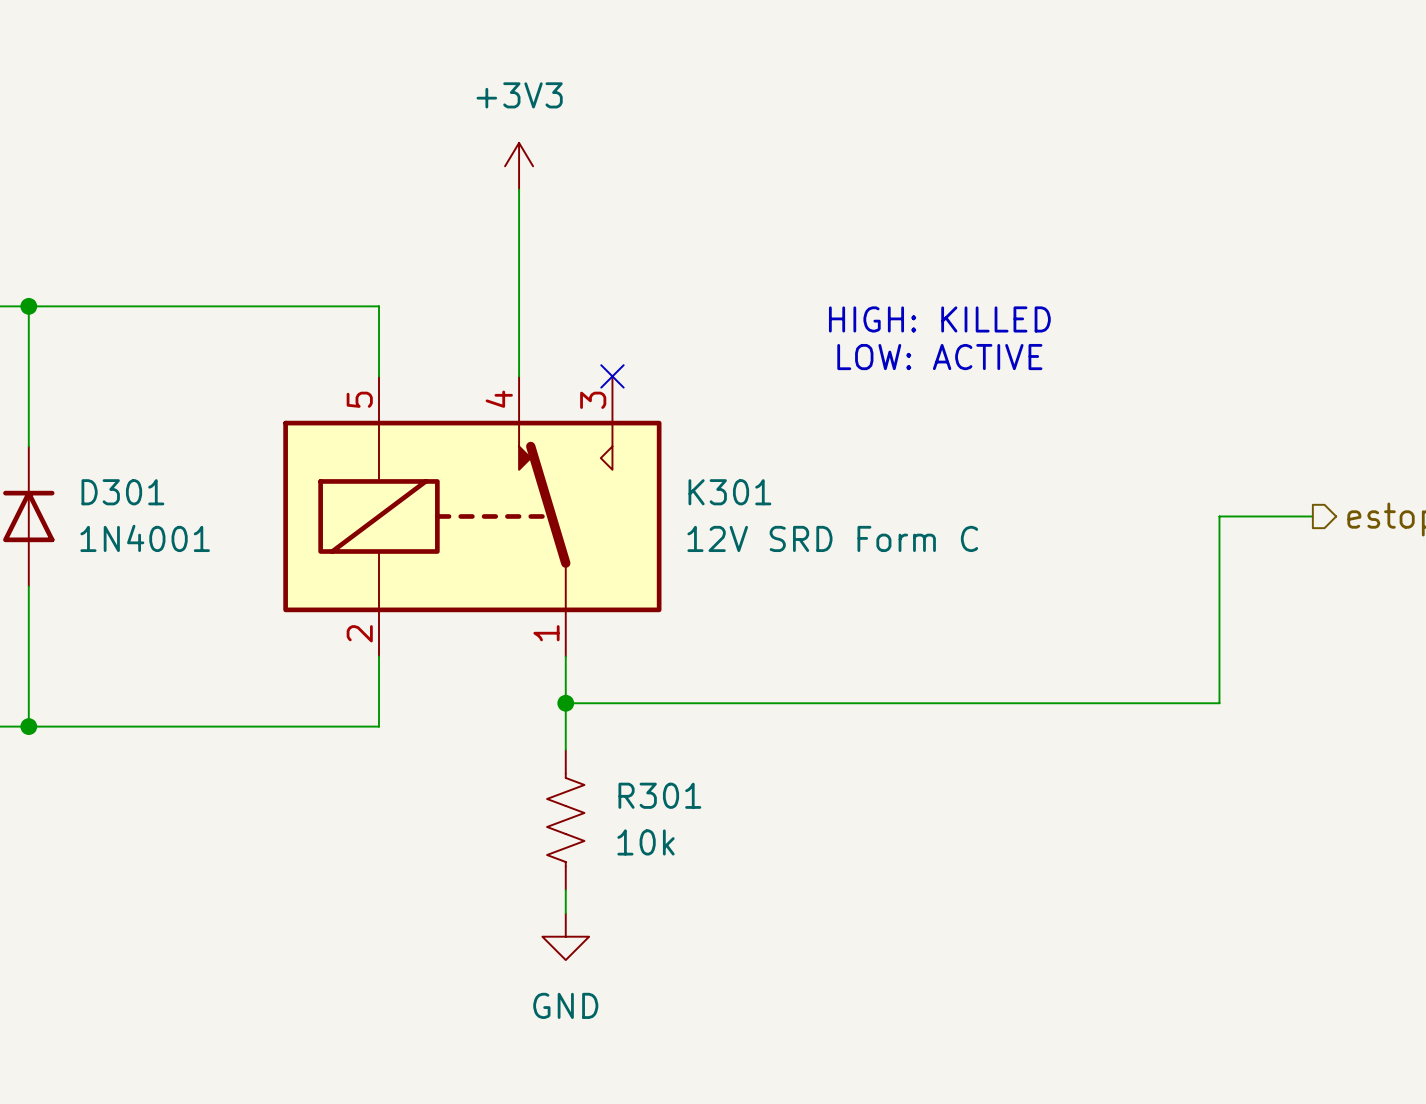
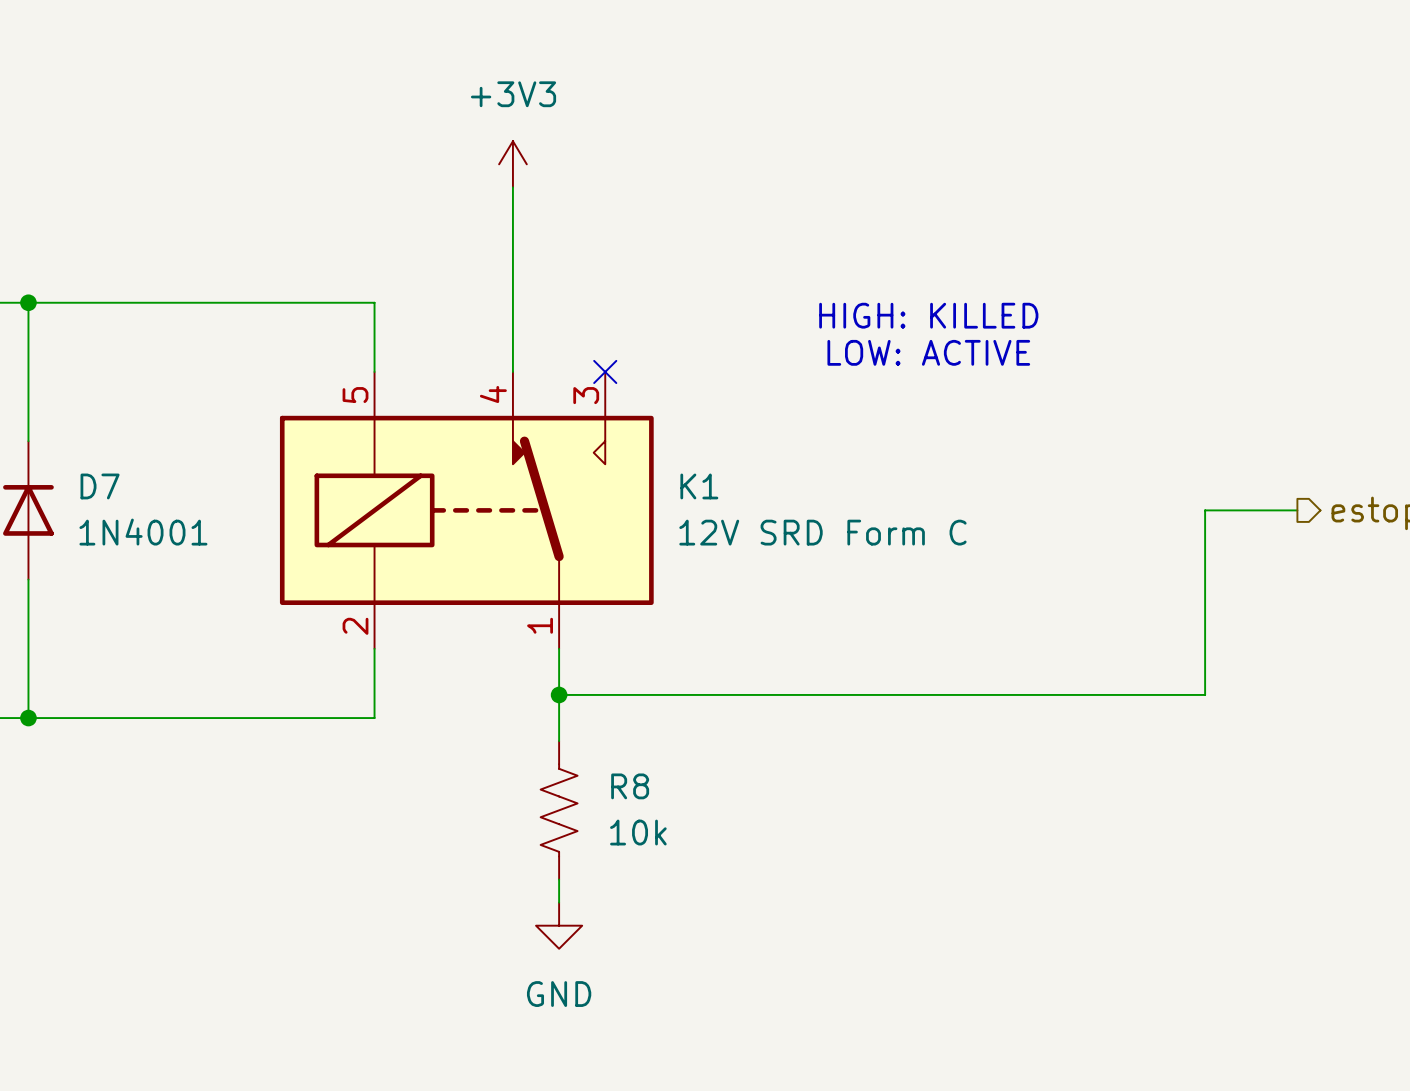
D301 name: D301 (122, 492) -> D7 (100, 486)
K301 name: K301 (729, 492) -> K1 (699, 486)
R301 name: R301 (659, 795) -> R8 (630, 786)

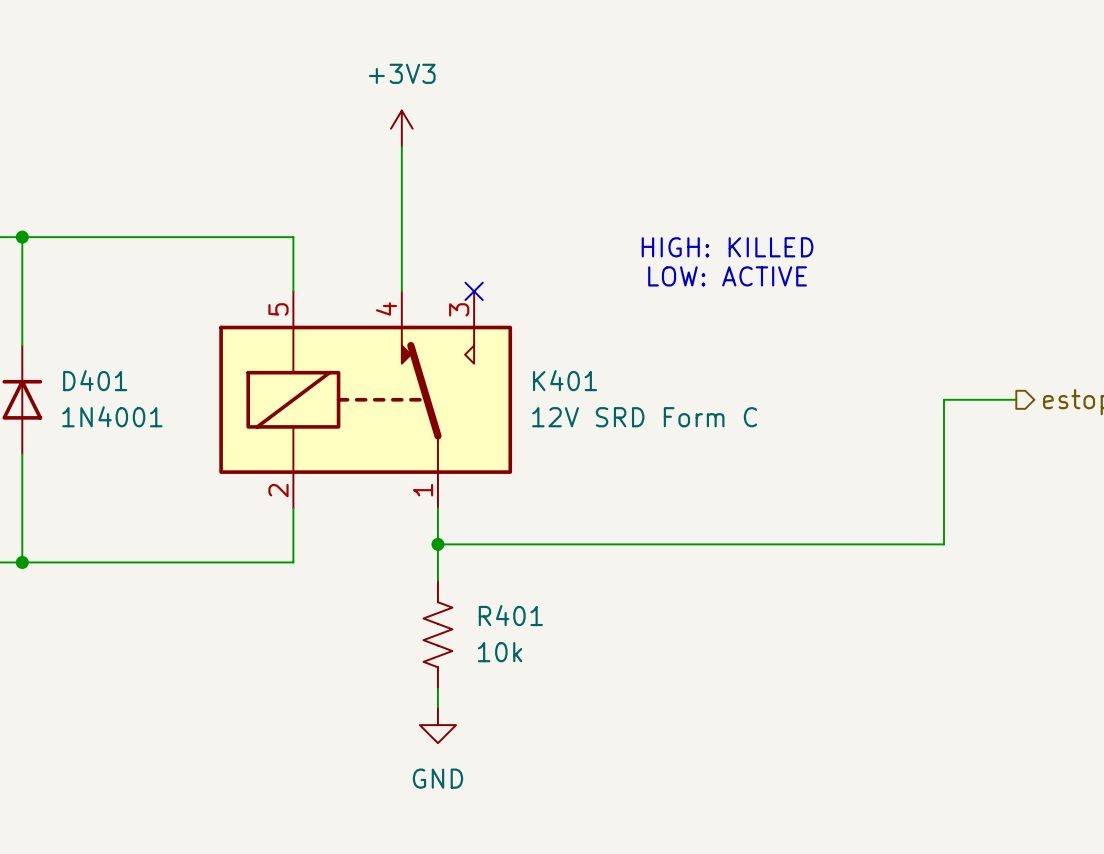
D7 name: D7 (100, 486) -> D401 (95, 380)
K1 name: K1 (699, 486) -> K401 (565, 380)
R8 name: R8 (630, 786) -> R401 (510, 615)

